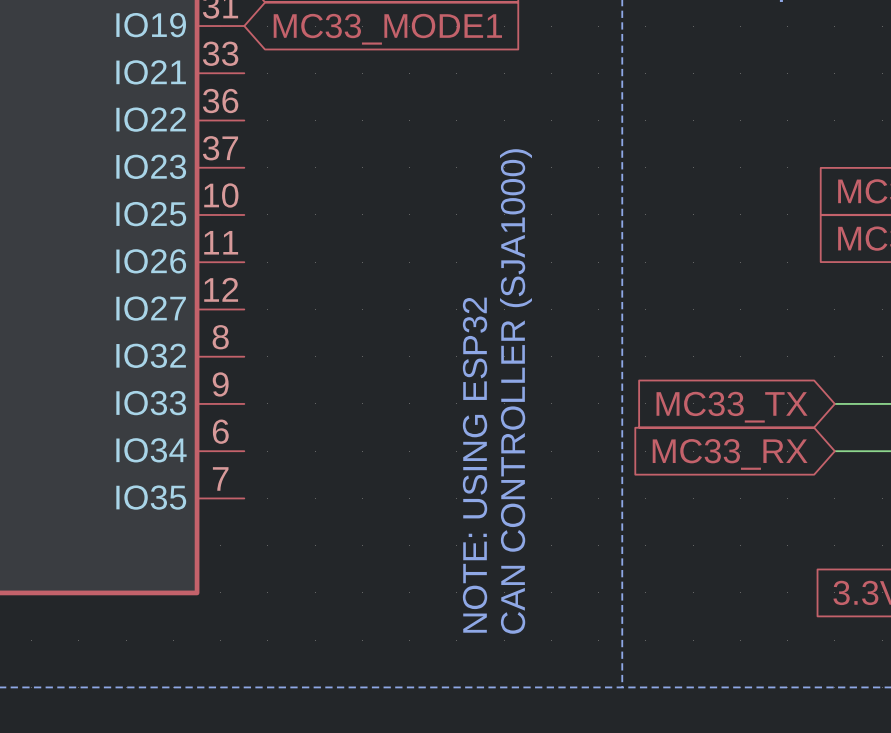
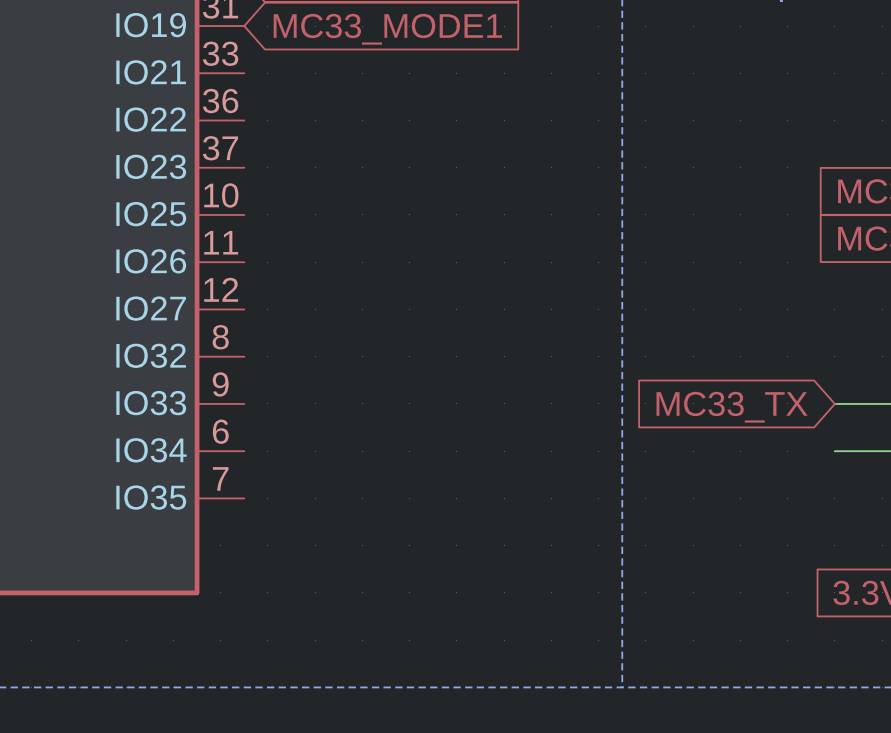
text: CAN CONTROLLER (SJA1000) (515, 391) -> none
global label: MC33_RX (730, 454) -> none
text: NOTE: USING ESP32 (475, 465) -> none

